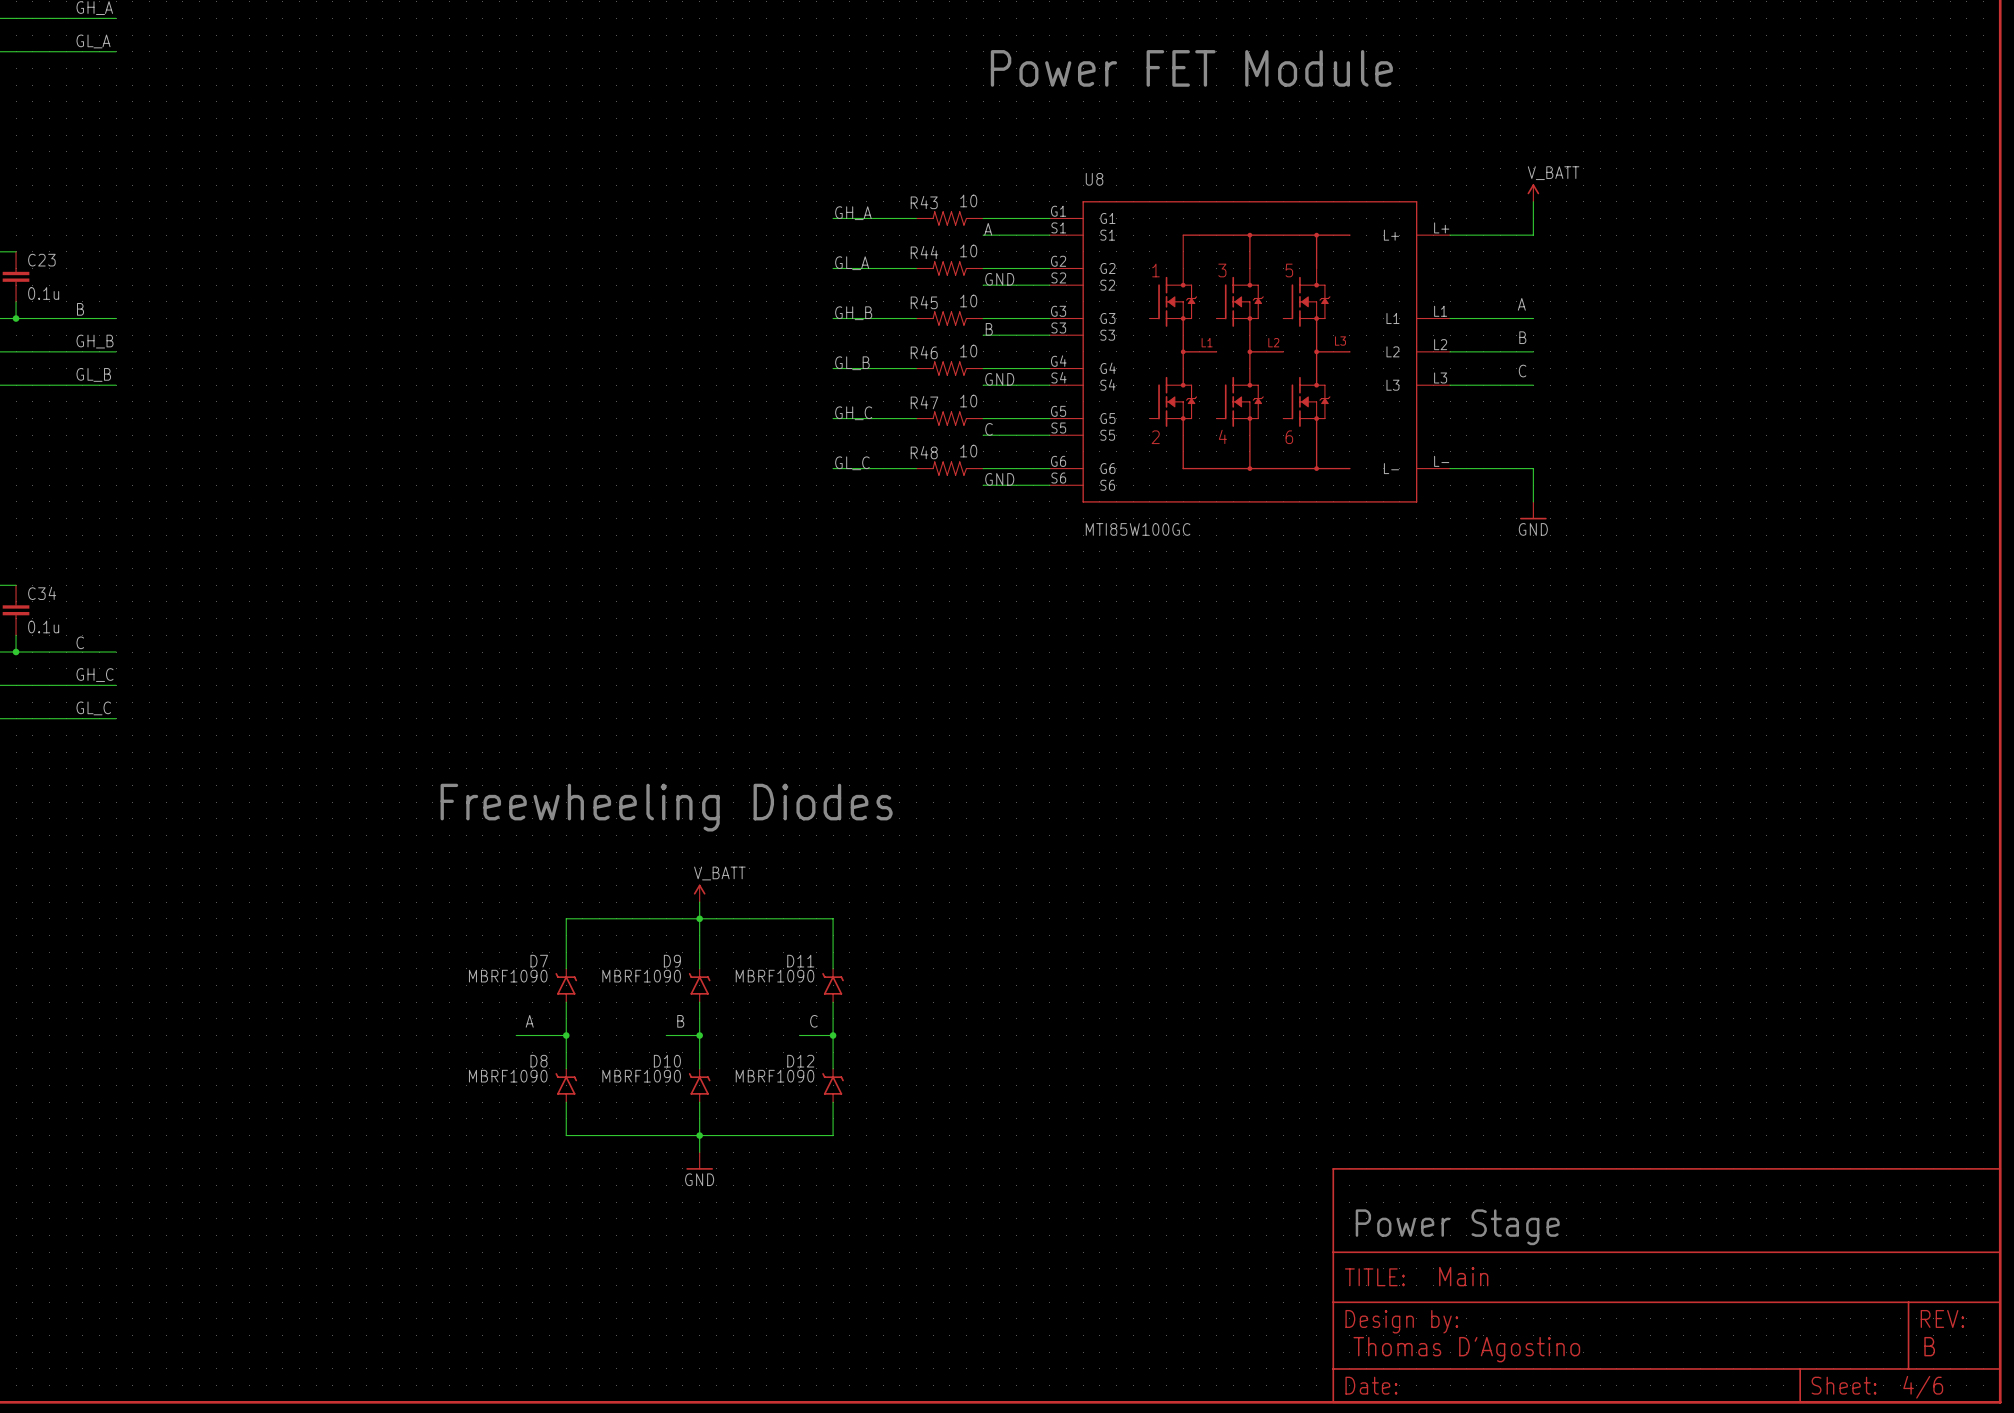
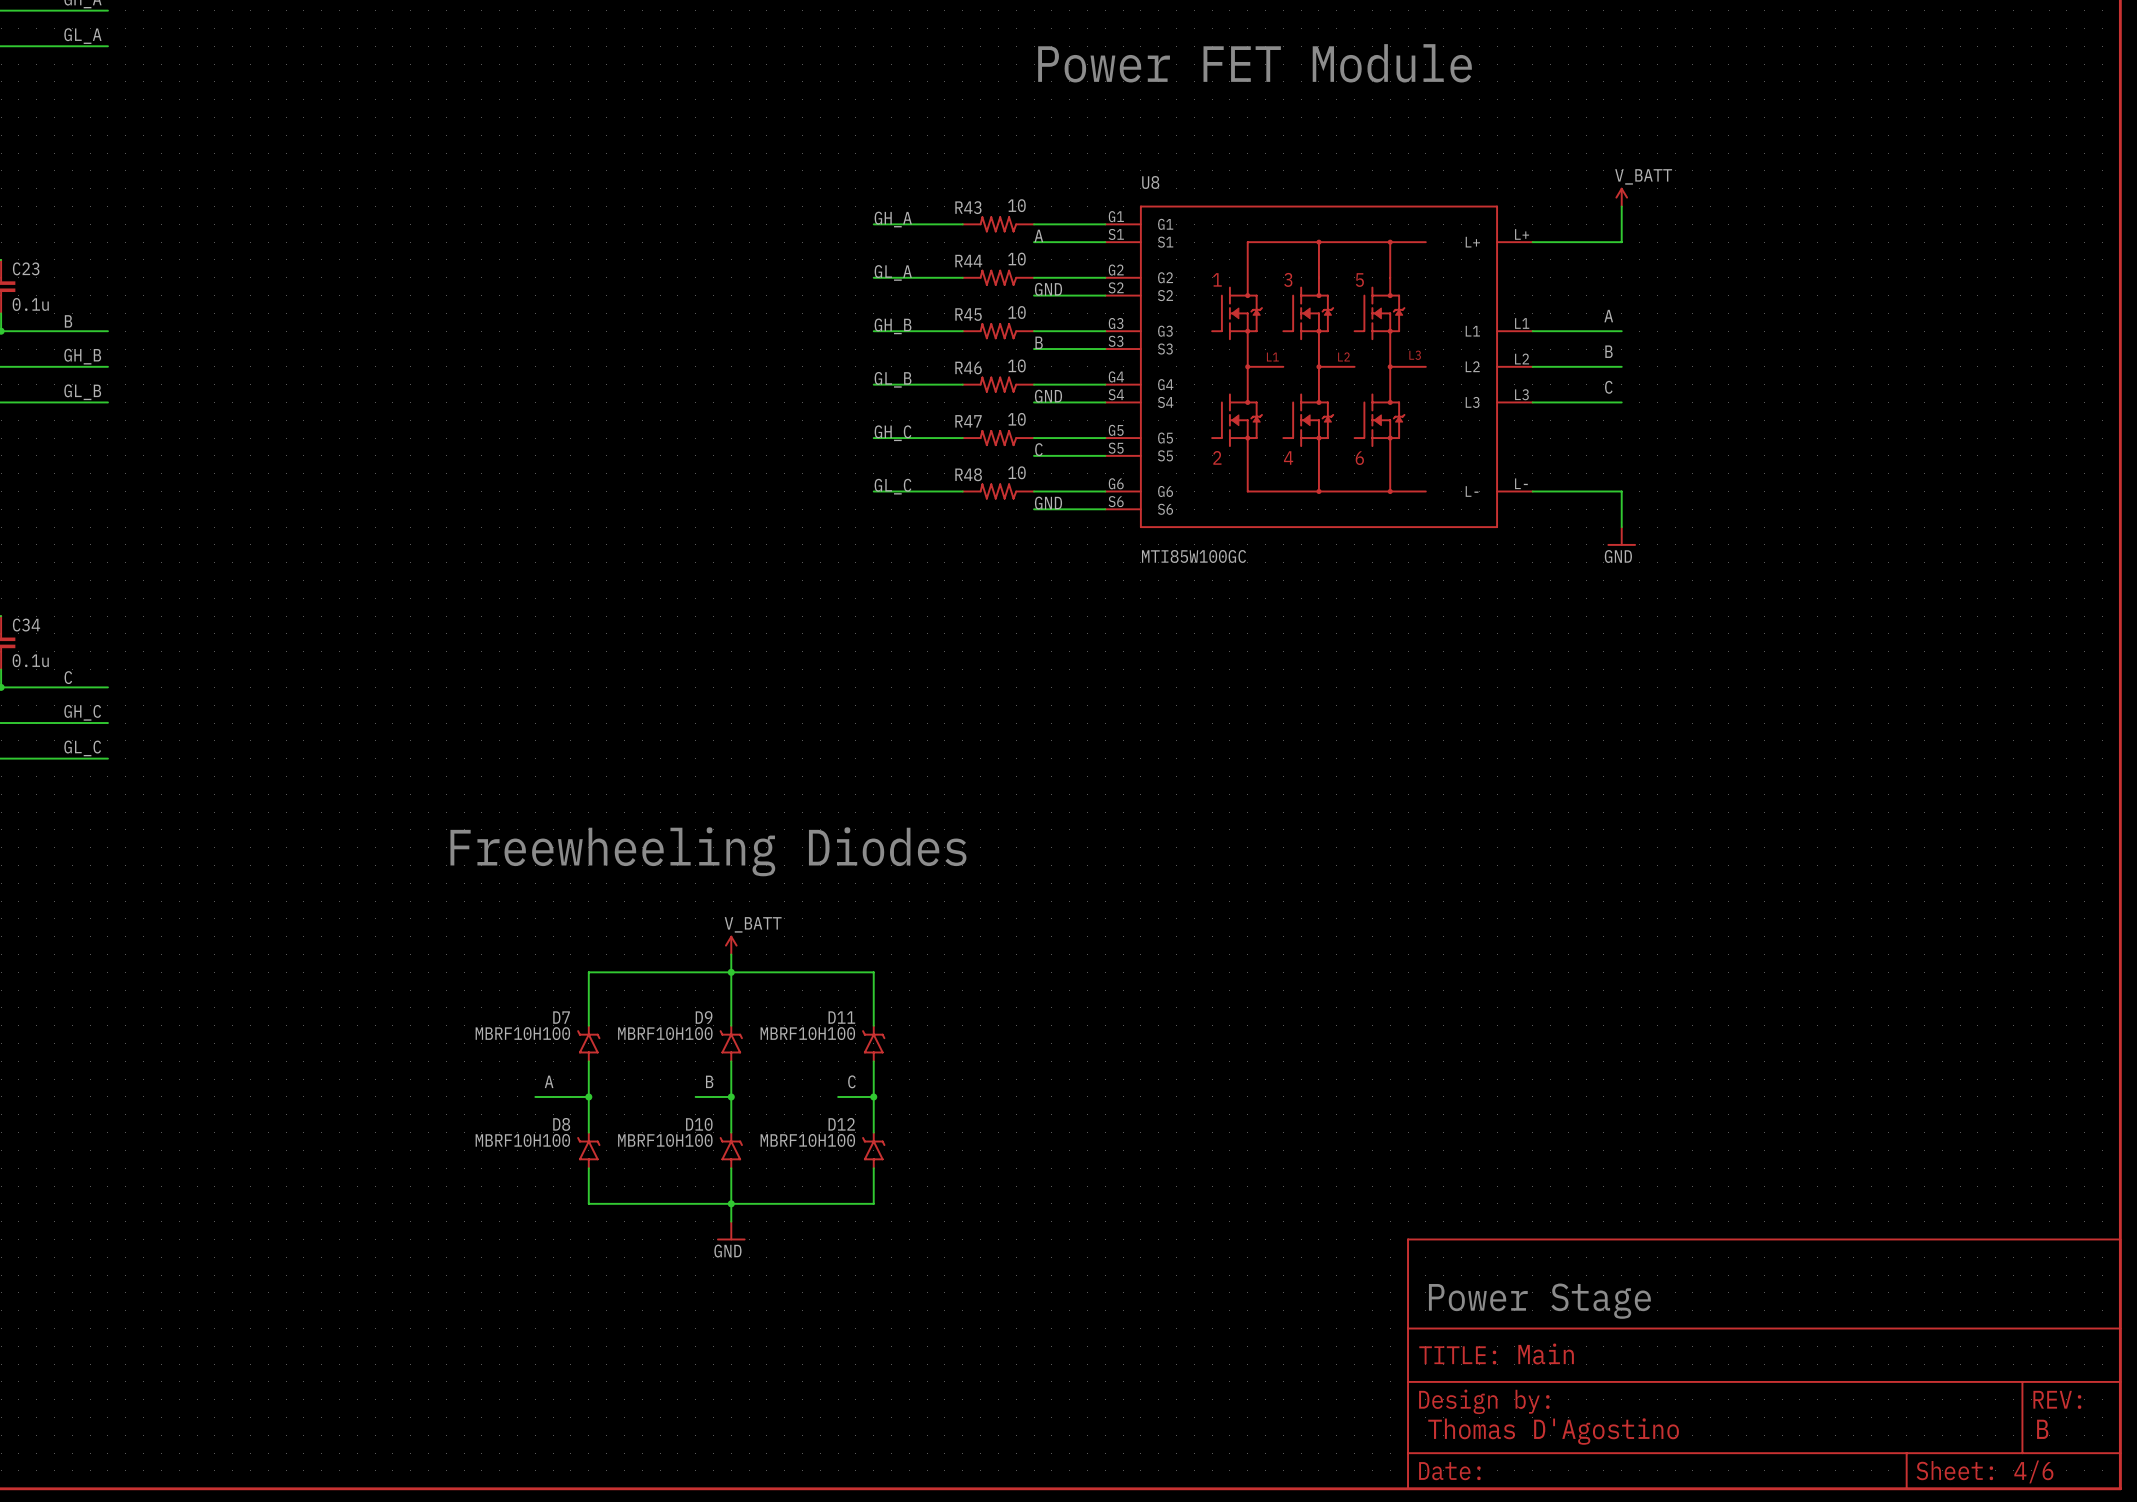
D7 value: MBRF1090 (508, 976) -> MBRF10H100 (522, 1033)
D9 value: MBRF1090 (641, 976) -> MBRF10H100 (665, 1033)
D11 value: MBRF1090 (775, 976) -> MBRF10H100 (807, 1033)
D8 value: MBRF1090 (508, 1076) -> MBRF10H100 (522, 1140)
D10 value: MBRF1090 (641, 1076) -> MBRF10H100 (665, 1140)
D12 value: MBRF1090 (775, 1076) -> MBRF10H100 (807, 1140)

